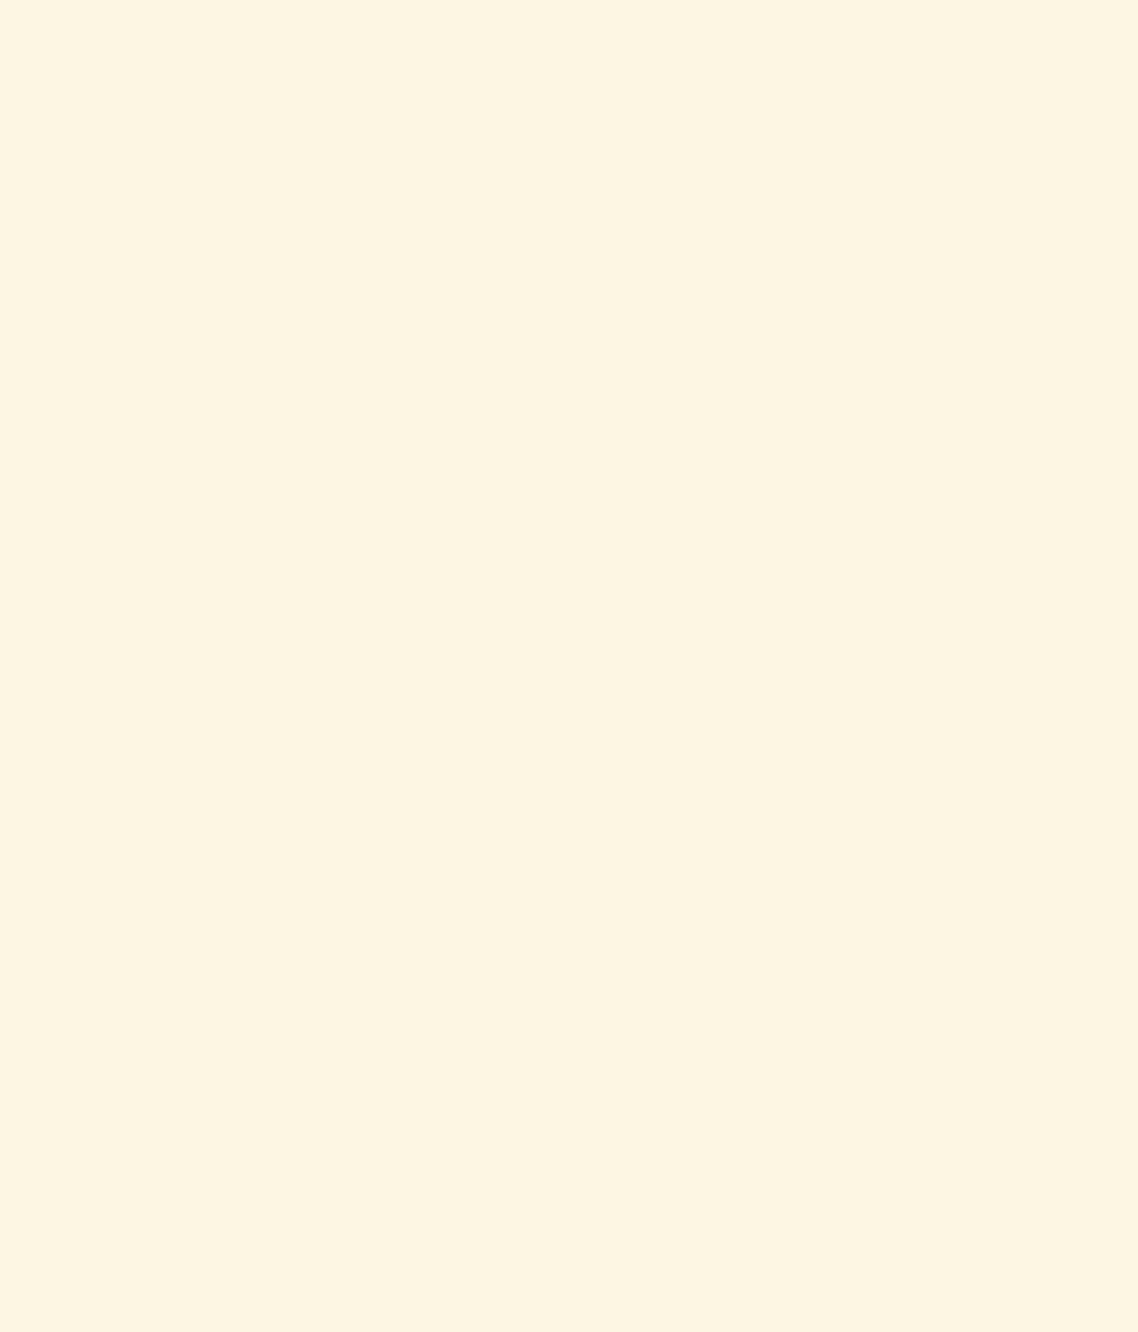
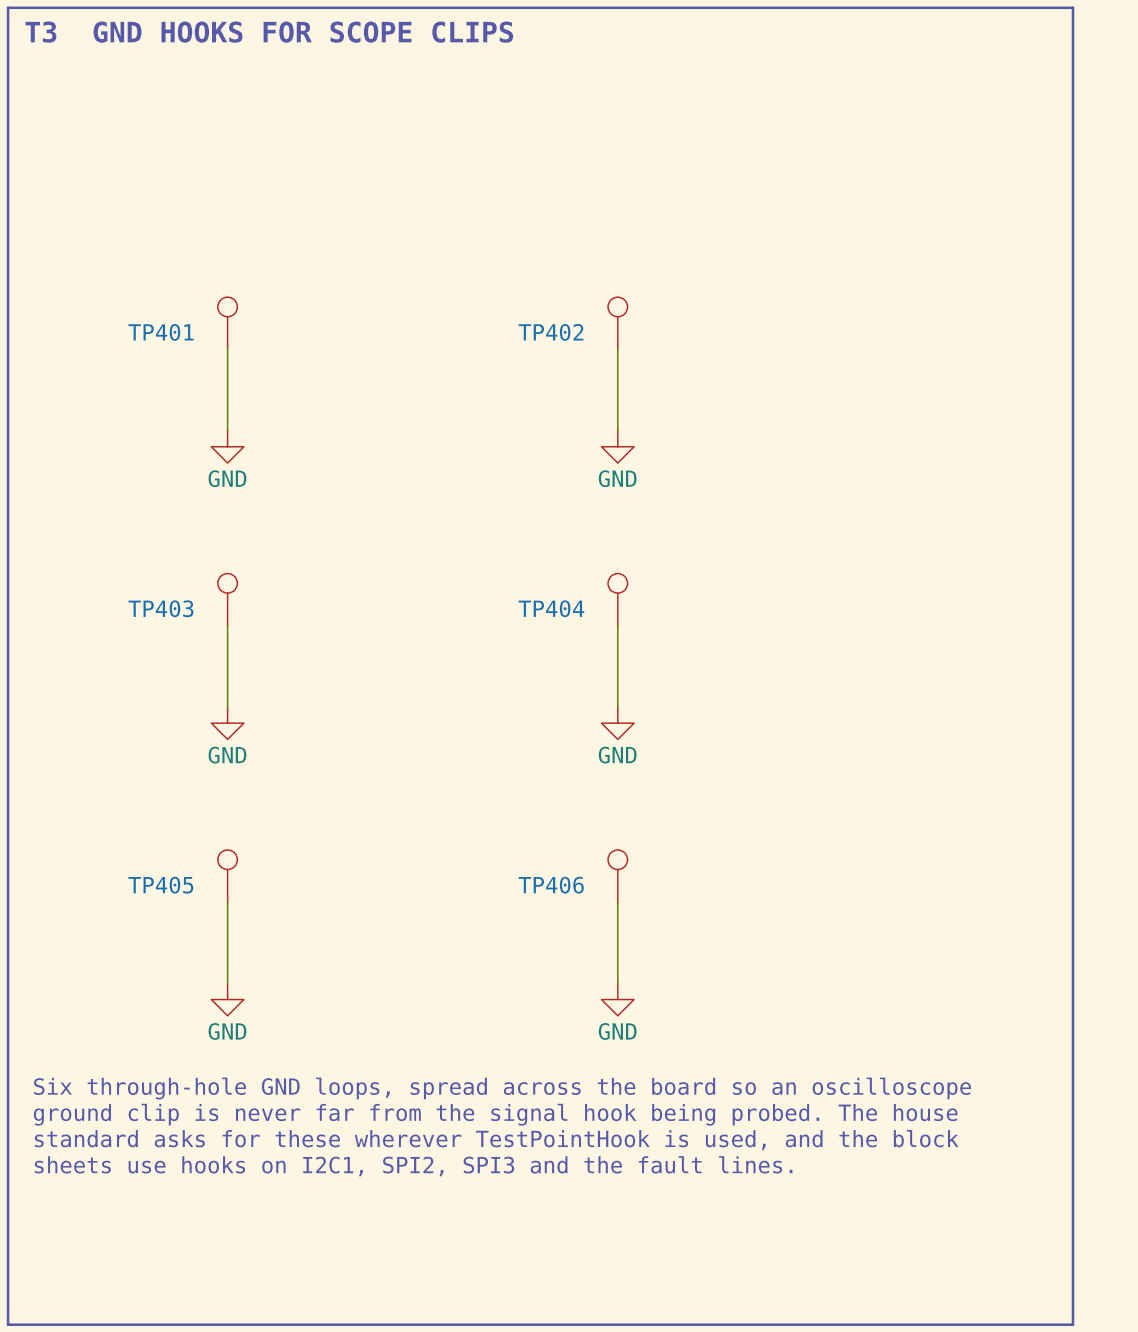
line: none -> (8, 7) (1073, 7) (1073, 1324) (8, 1324) (8, 7)
text: none -> T3 GND HOOKS FOR SCOPE CLIPS (269, 32)
TP401: none -> (227, 323)
TP402: none -> (617, 323)
wire: none -> (227, 349) (227, 430)
wire: none -> (617, 349) (617, 430)
power symbol: none -> GND (227, 446)
power symbol: none -> GND (617, 446)
TP403: none -> (227, 599)
TP404: none -> (617, 599)
wire: none -> (227, 625) (227, 706)
wire: none -> (617, 625) (617, 706)
power symbol: none -> GND (227, 723)
power symbol: none -> GND (617, 723)
TP405: none -> (227, 875)
TP406: none -> (617, 875)
wire: none -> (227, 902) (227, 983)
wire: none -> (617, 902) (617, 983)
power symbol: none -> GND (227, 999)
power symbol: none -> GND (617, 999)
text: none -> Six through-hole GND loops, spread across the board so an oscilloscope (502, 1088)
text: none -> ground clip is never far from the signal hook being probed. The house (495, 1114)
text: none -> standard asks for these wherever TestPointHook is used, and the block (496, 1140)
text: none -> sheets use hooks on I2C1, SPI2, SPI3 and the fault lines. (413, 1166)

